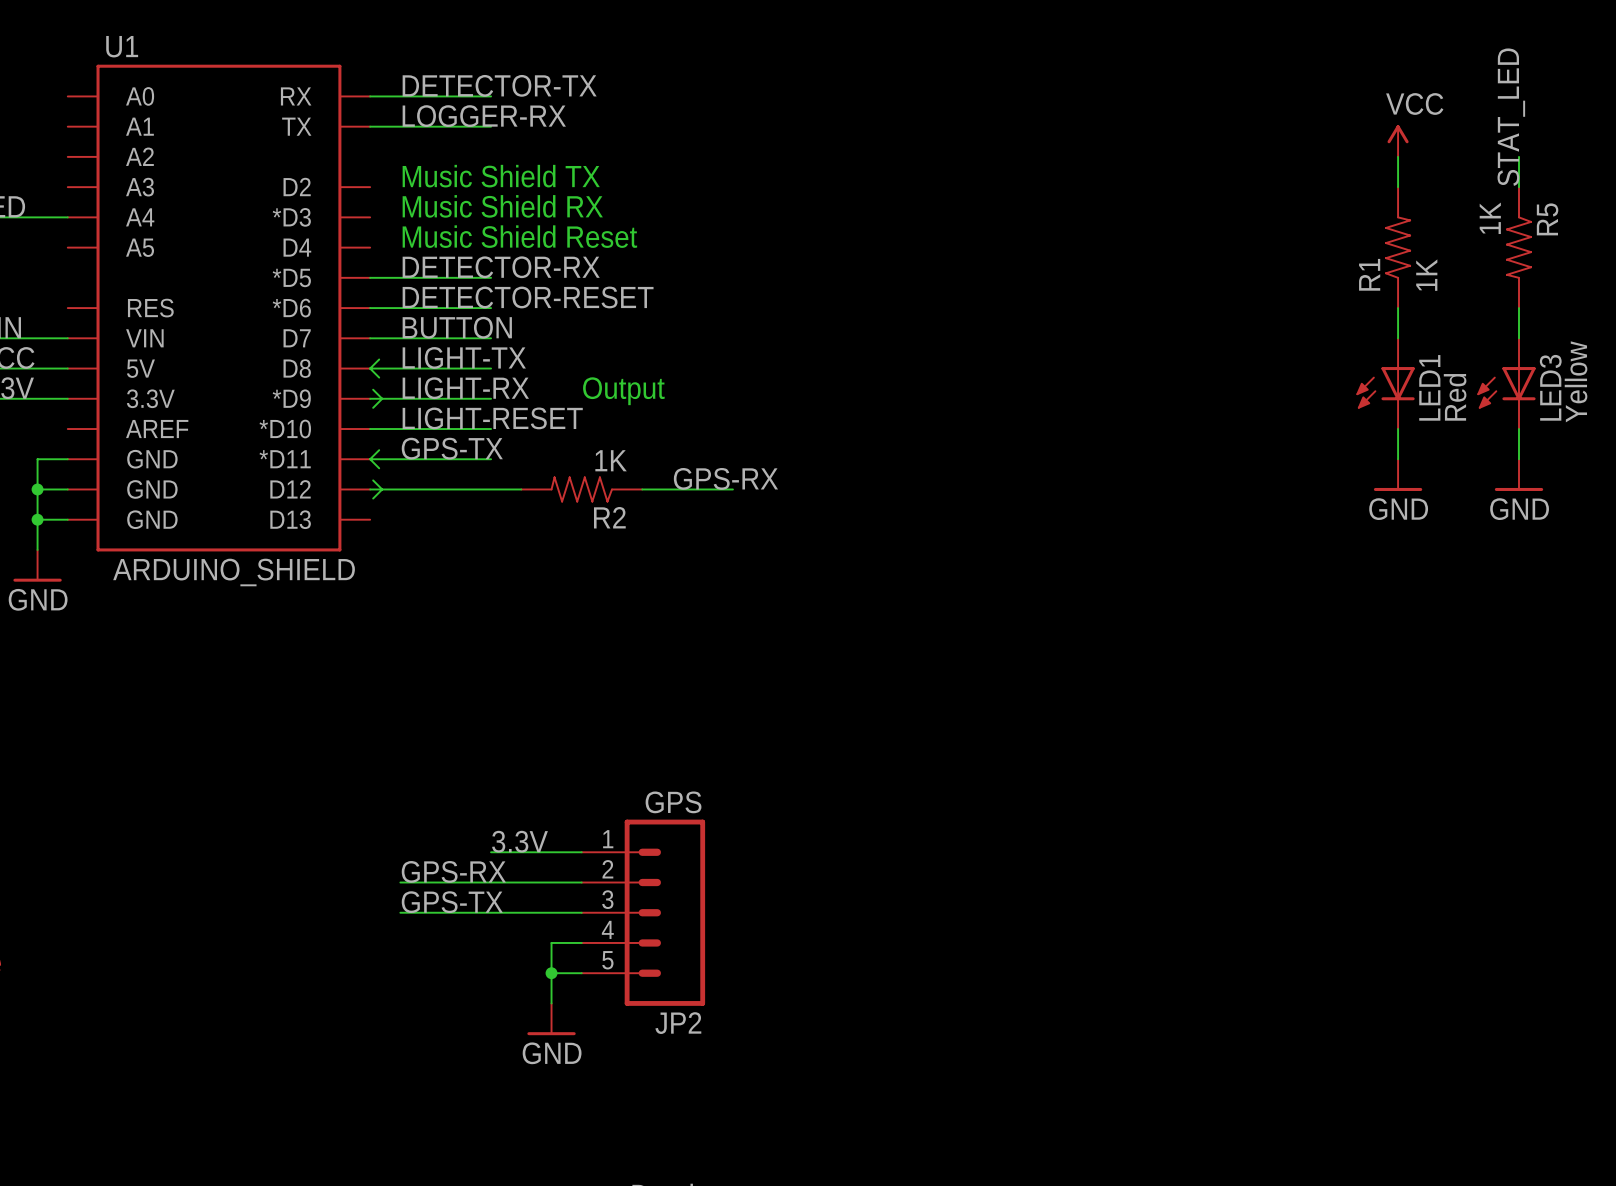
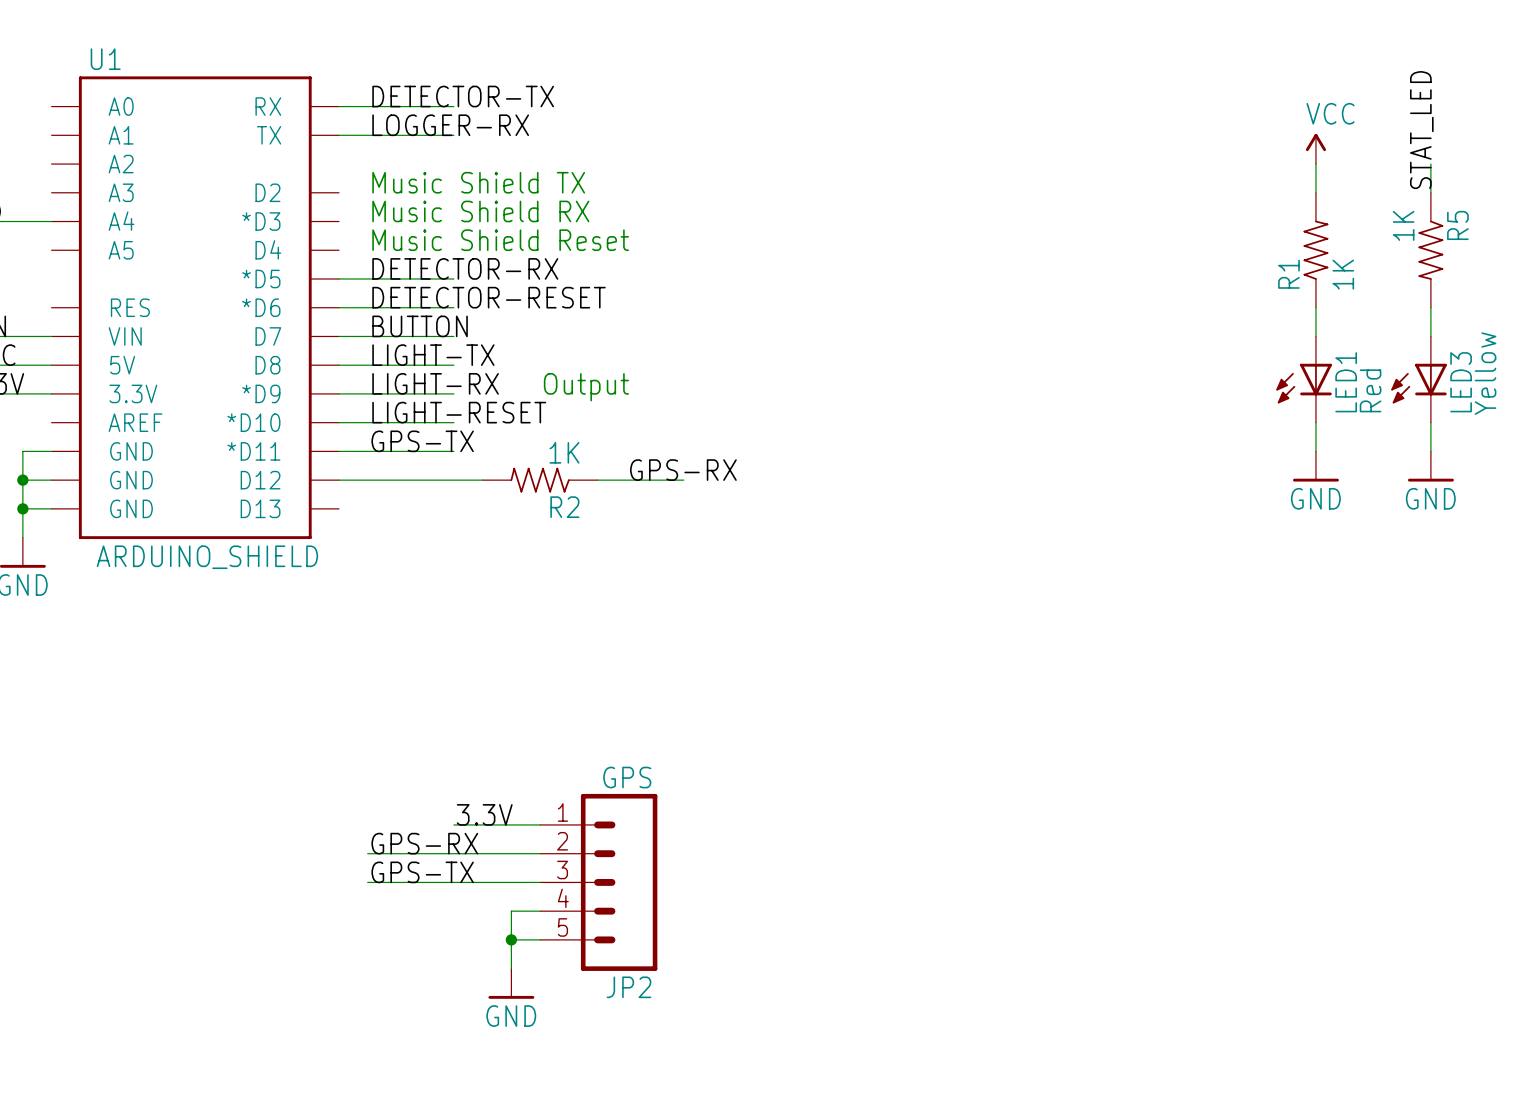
wire: (379, 359) (370, 368) (379, 377) -> none
wire: (373, 389) (382, 398) (373, 407) -> none
wire: (379, 450) (370, 459) (379, 468) -> none
wire: (373, 480) (382, 489) (373, 498) -> none

